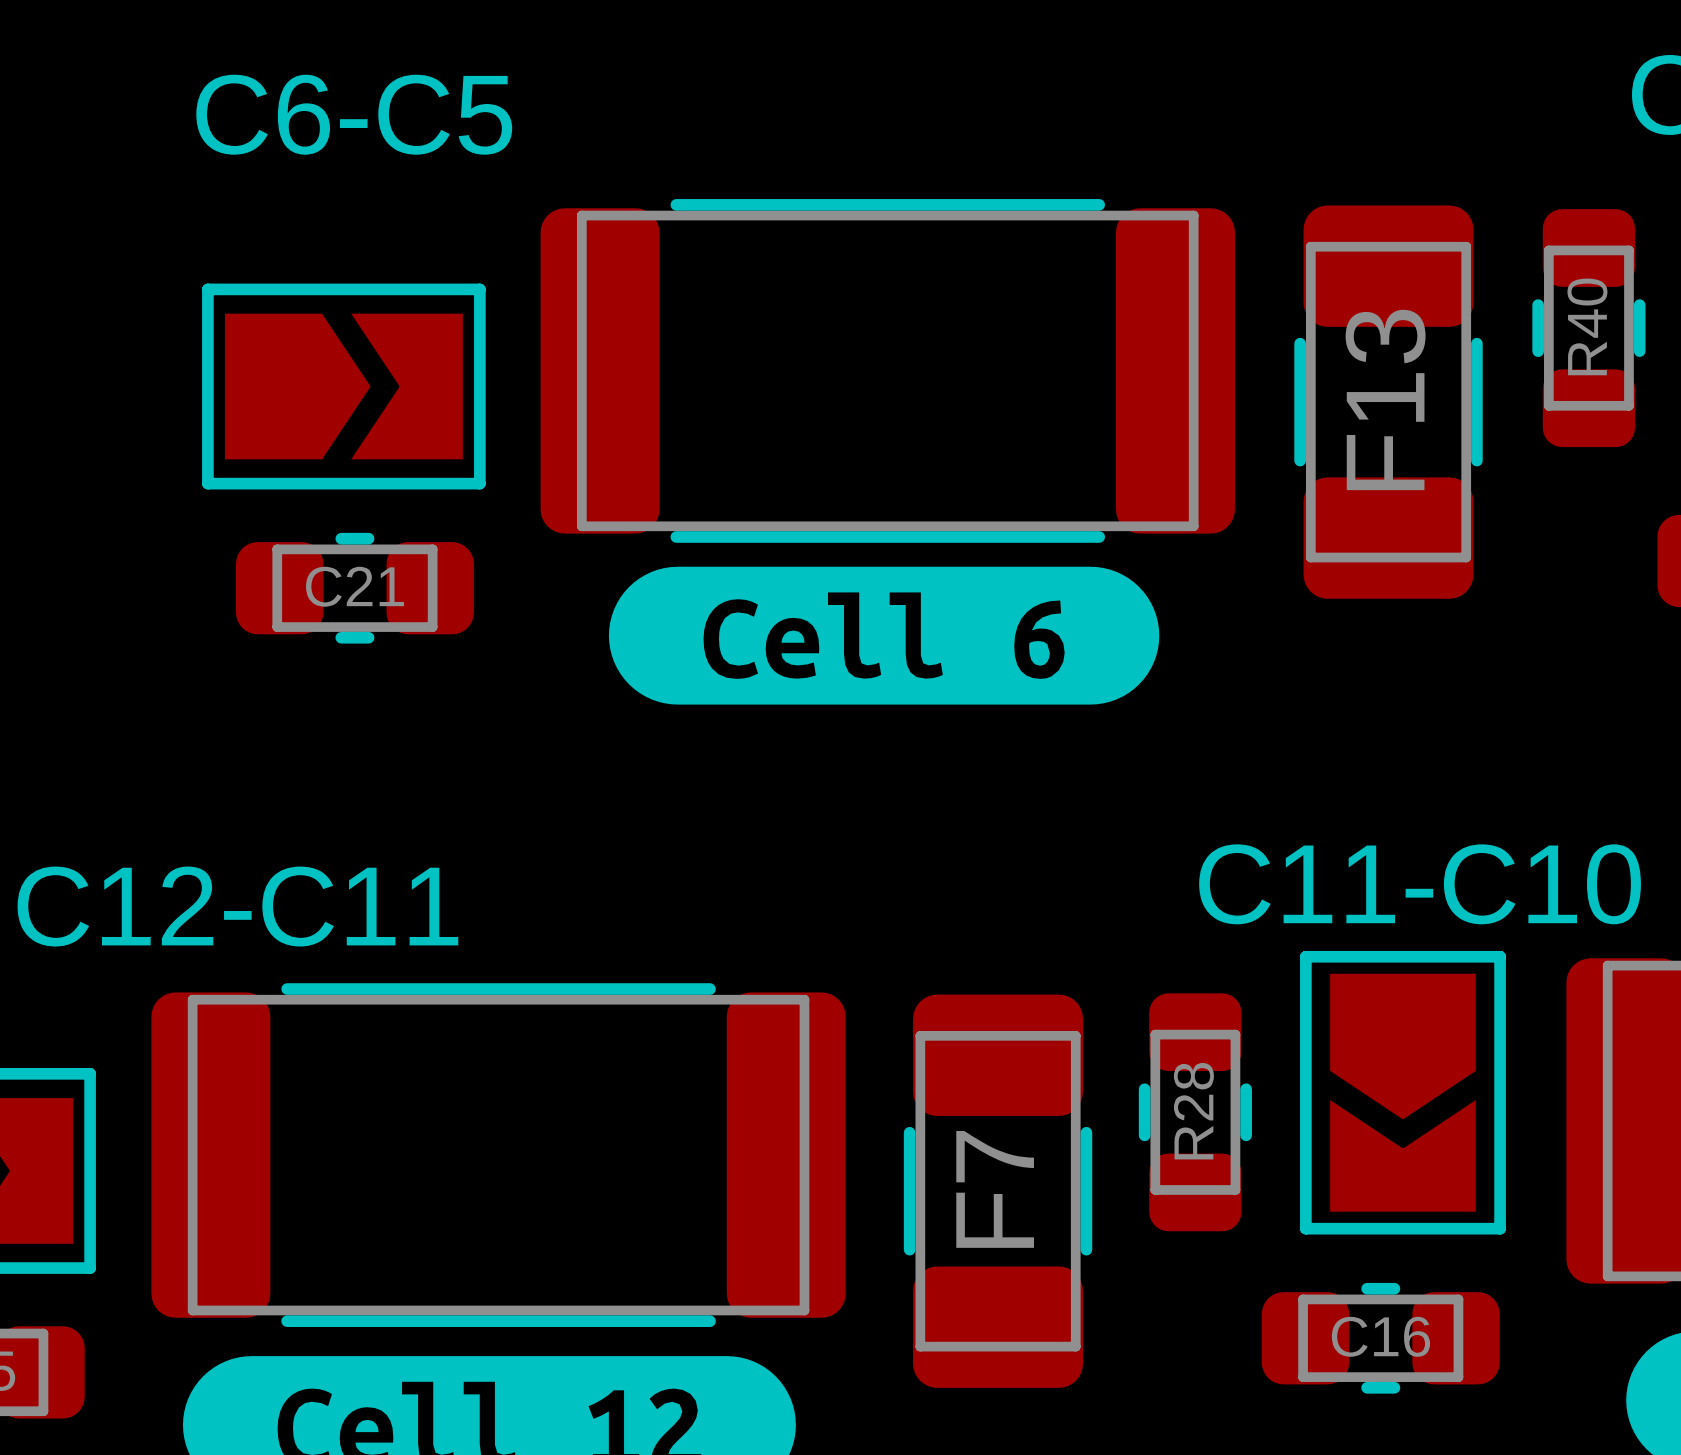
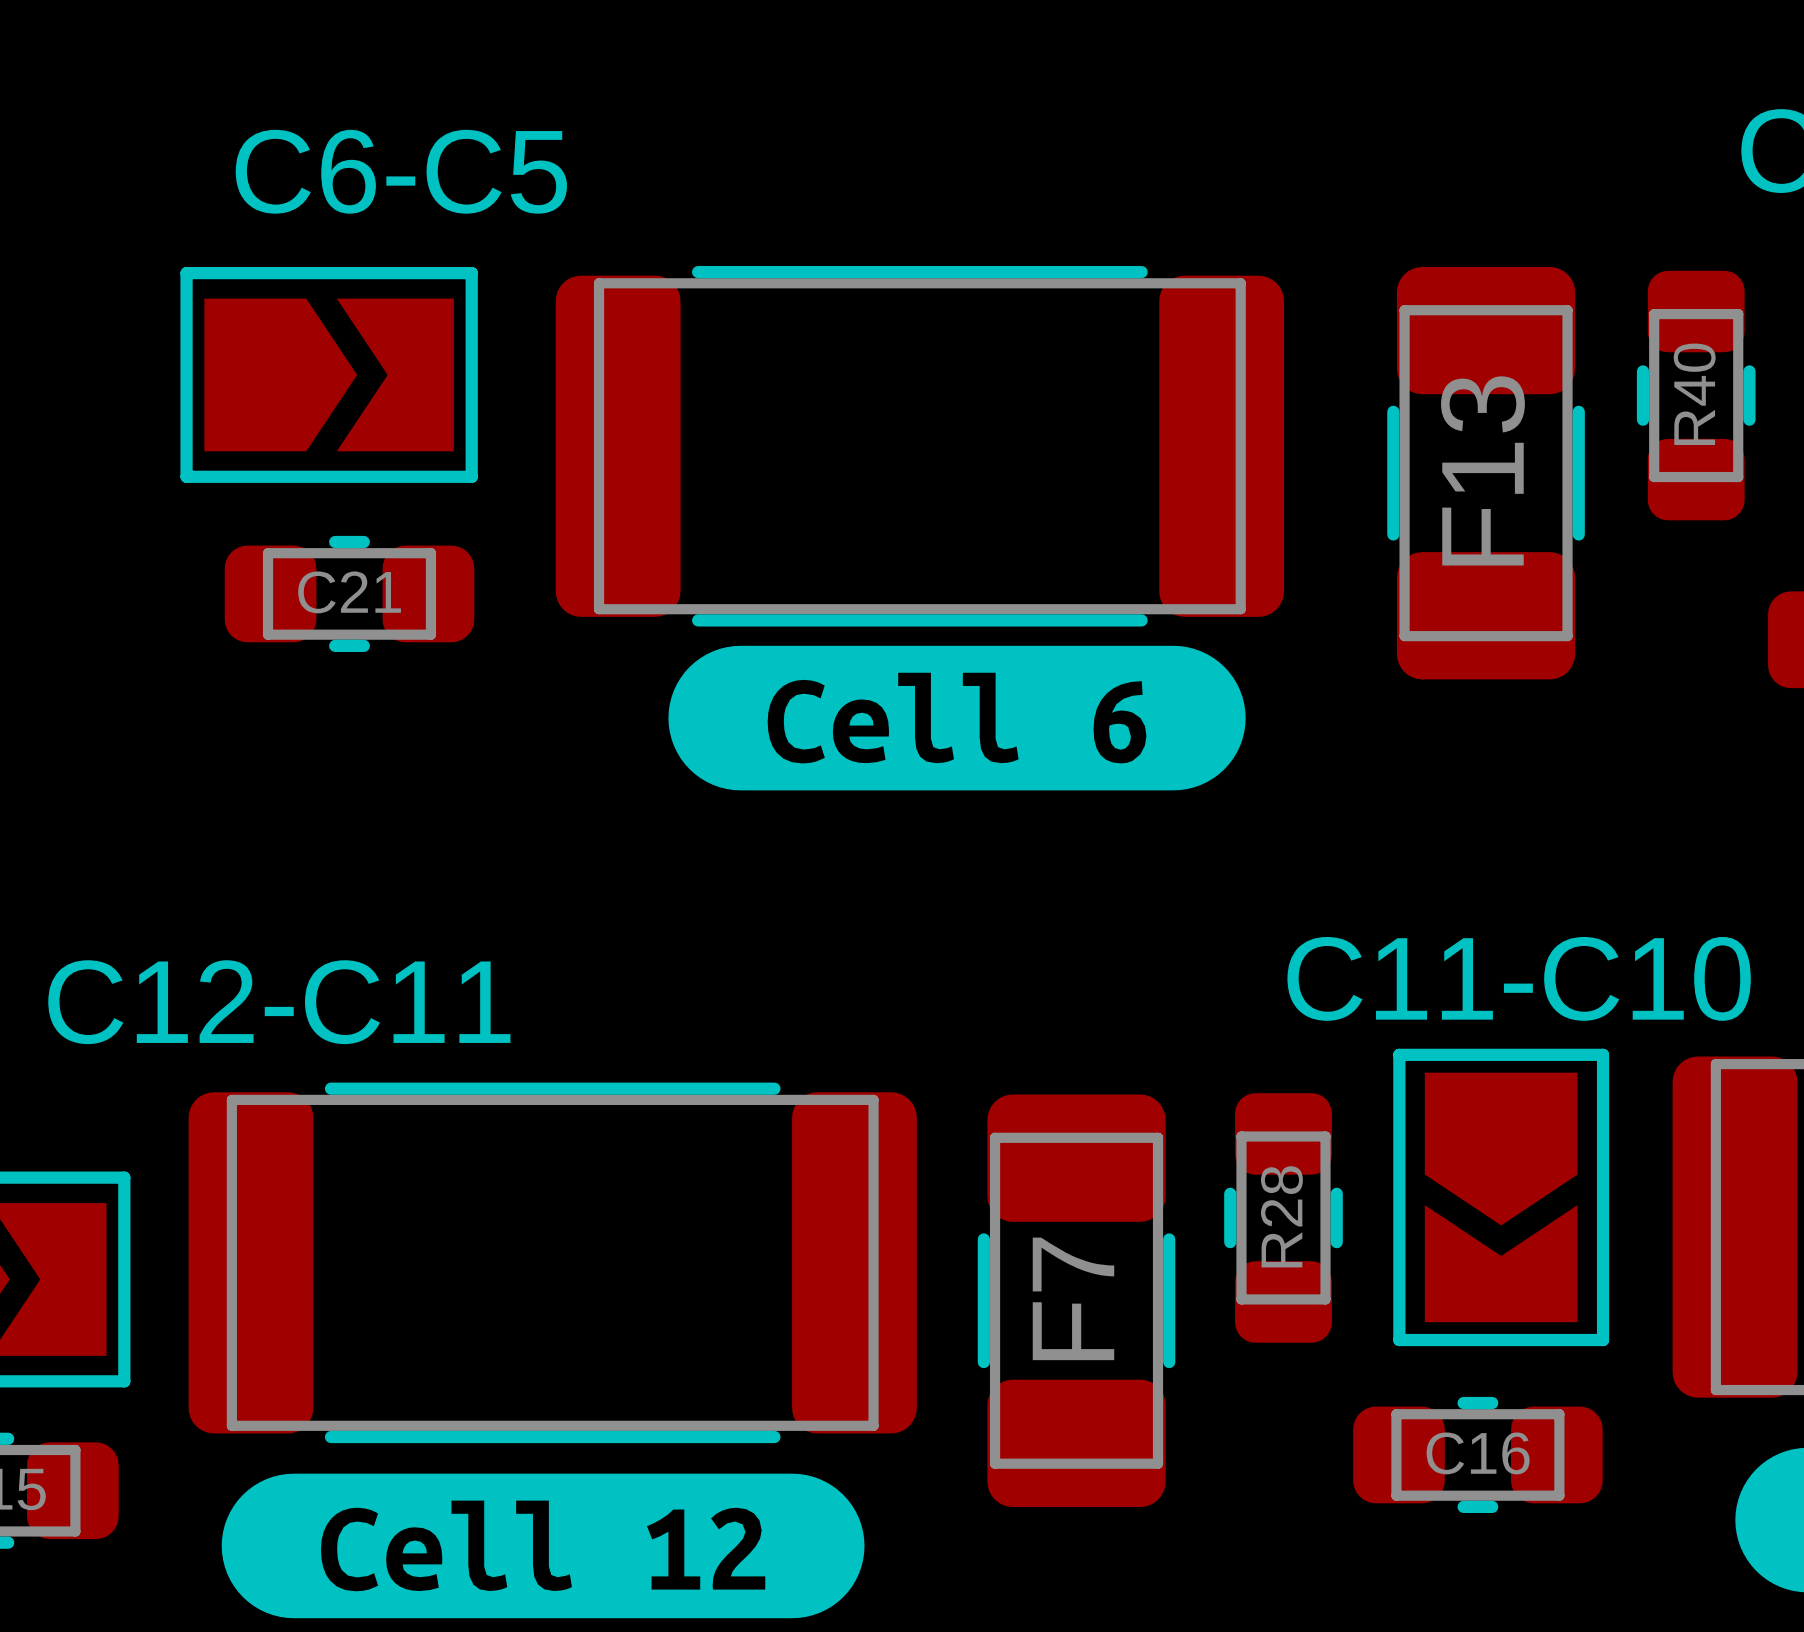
part position: (887, 370) -> (919, 446)
part position: (343, 386) -> (329, 374)
C21 position: (354, 588) -> (349, 593)

